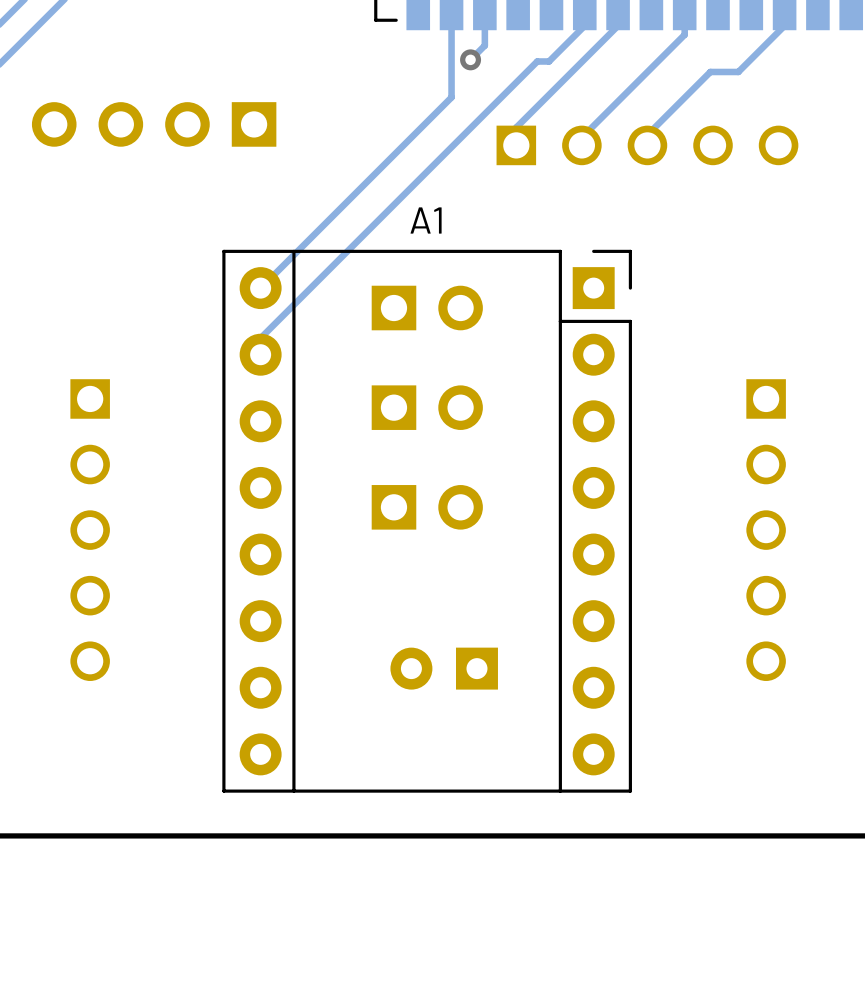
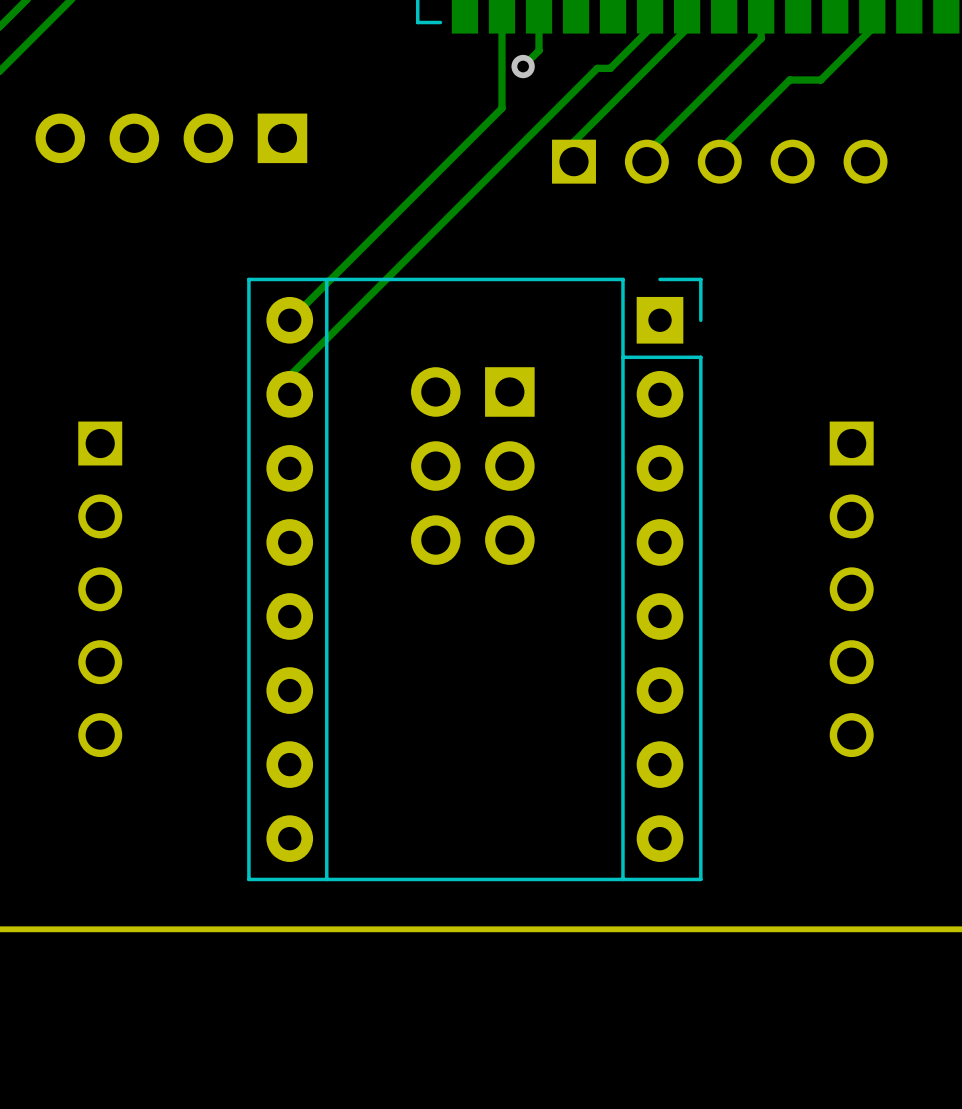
A1 name: A1 (426, 220) -> none
part: (427, 308) -> none
part footprint: [371, 385, 483, 430] -> [411, 367, 535, 565]
part: (427, 507) -> none
part: (444, 668) -> none

